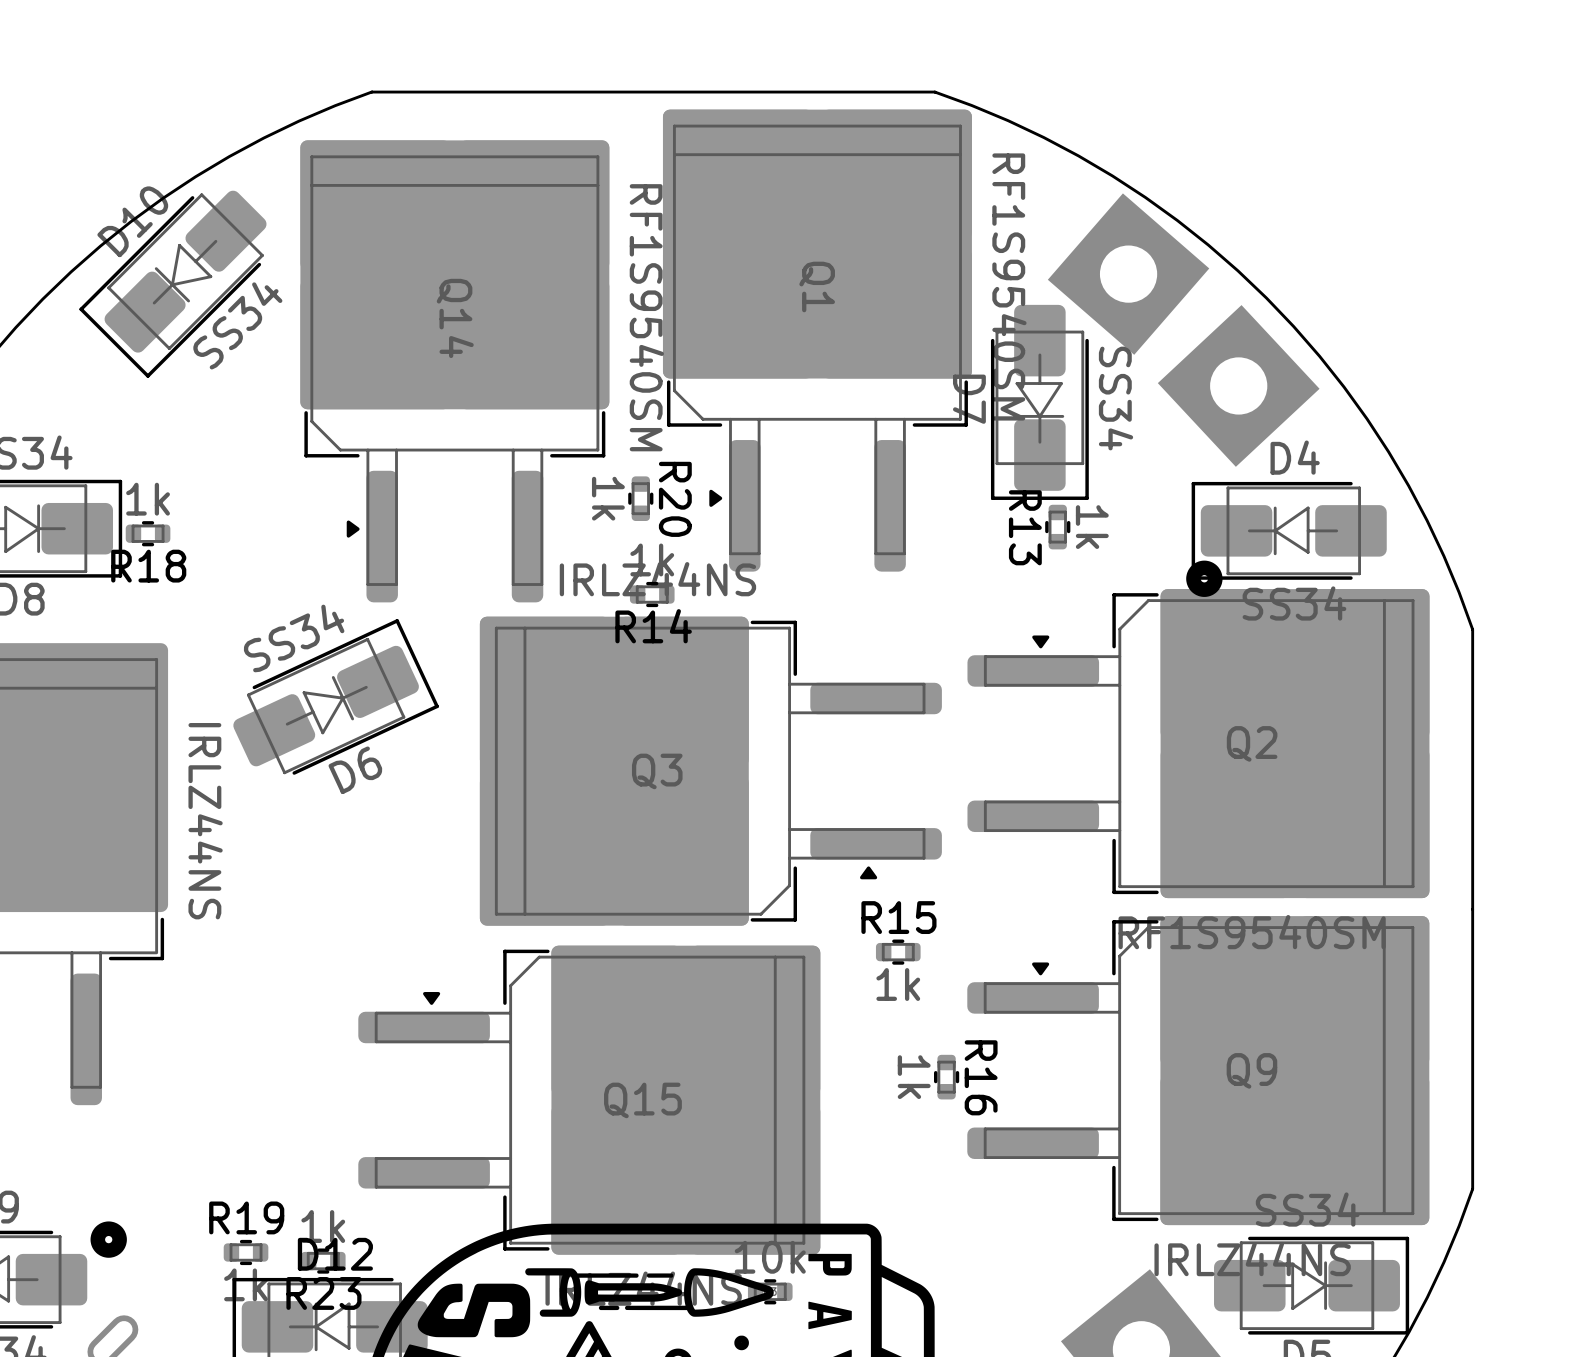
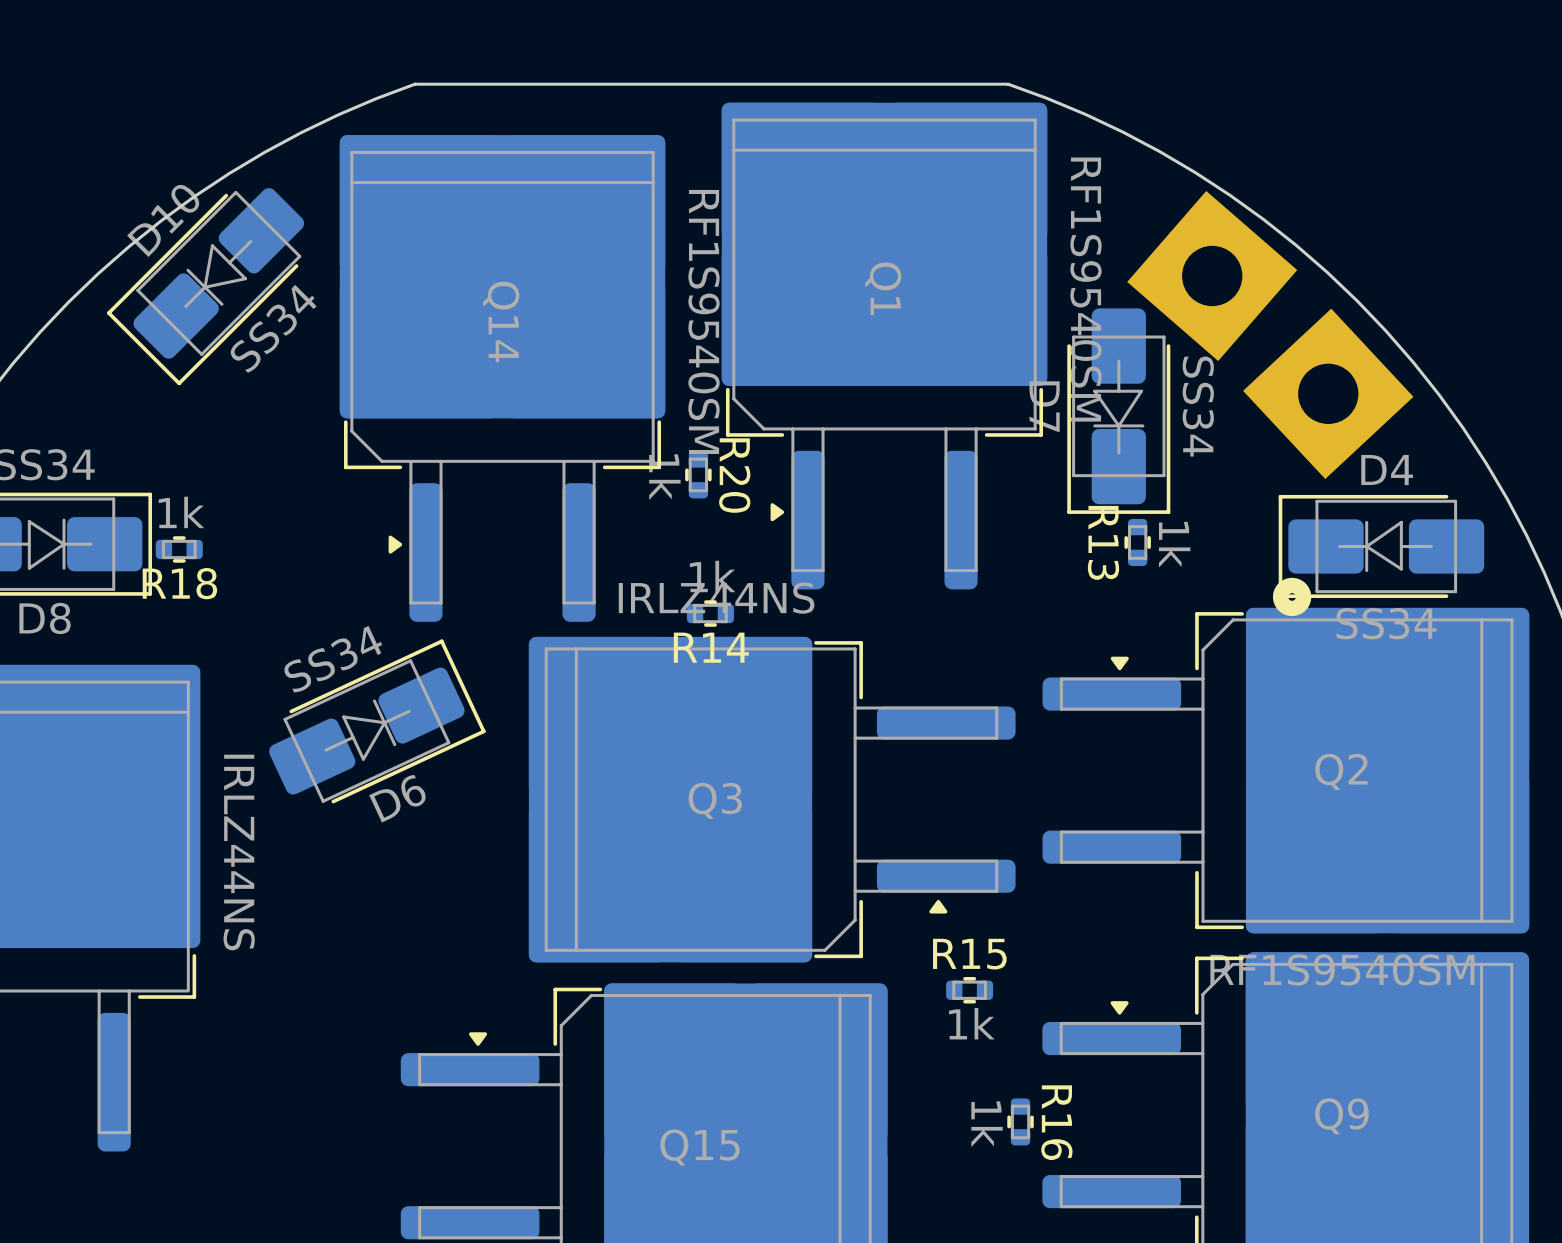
R20 position: (640, 498) -> (698, 474)

